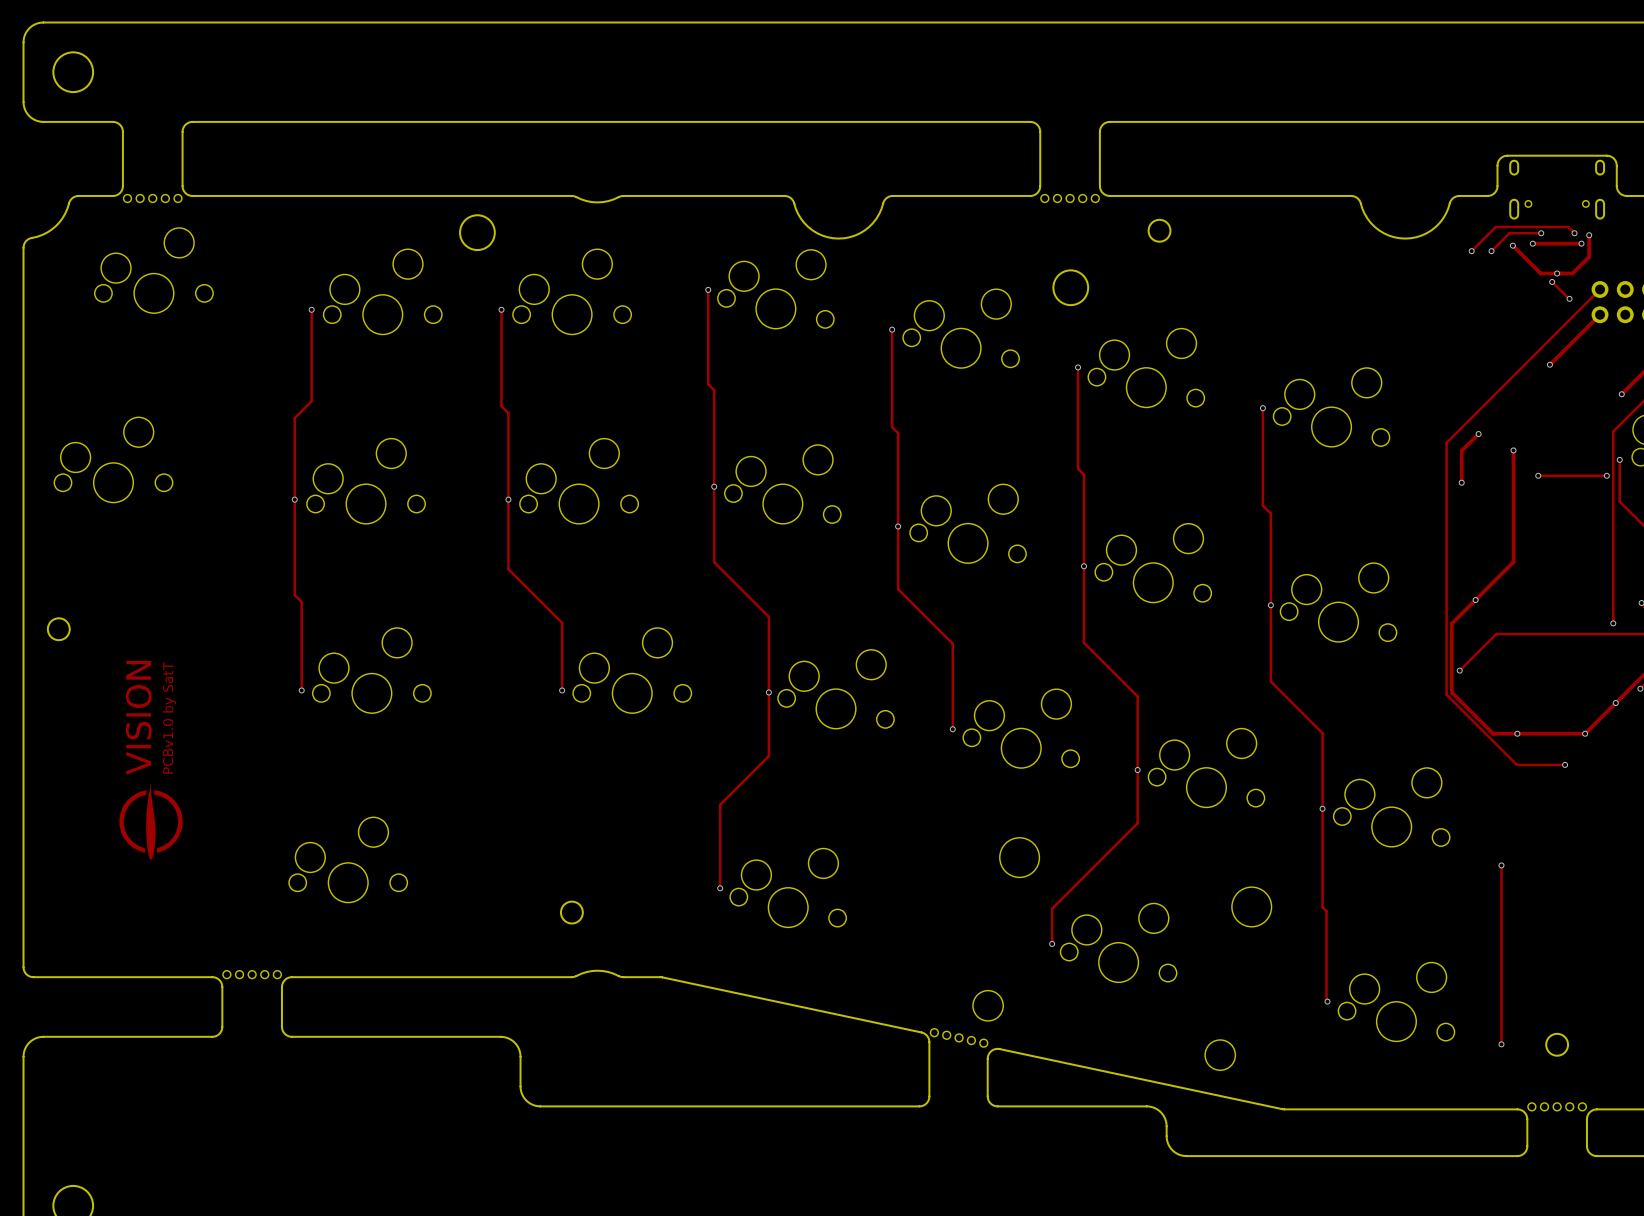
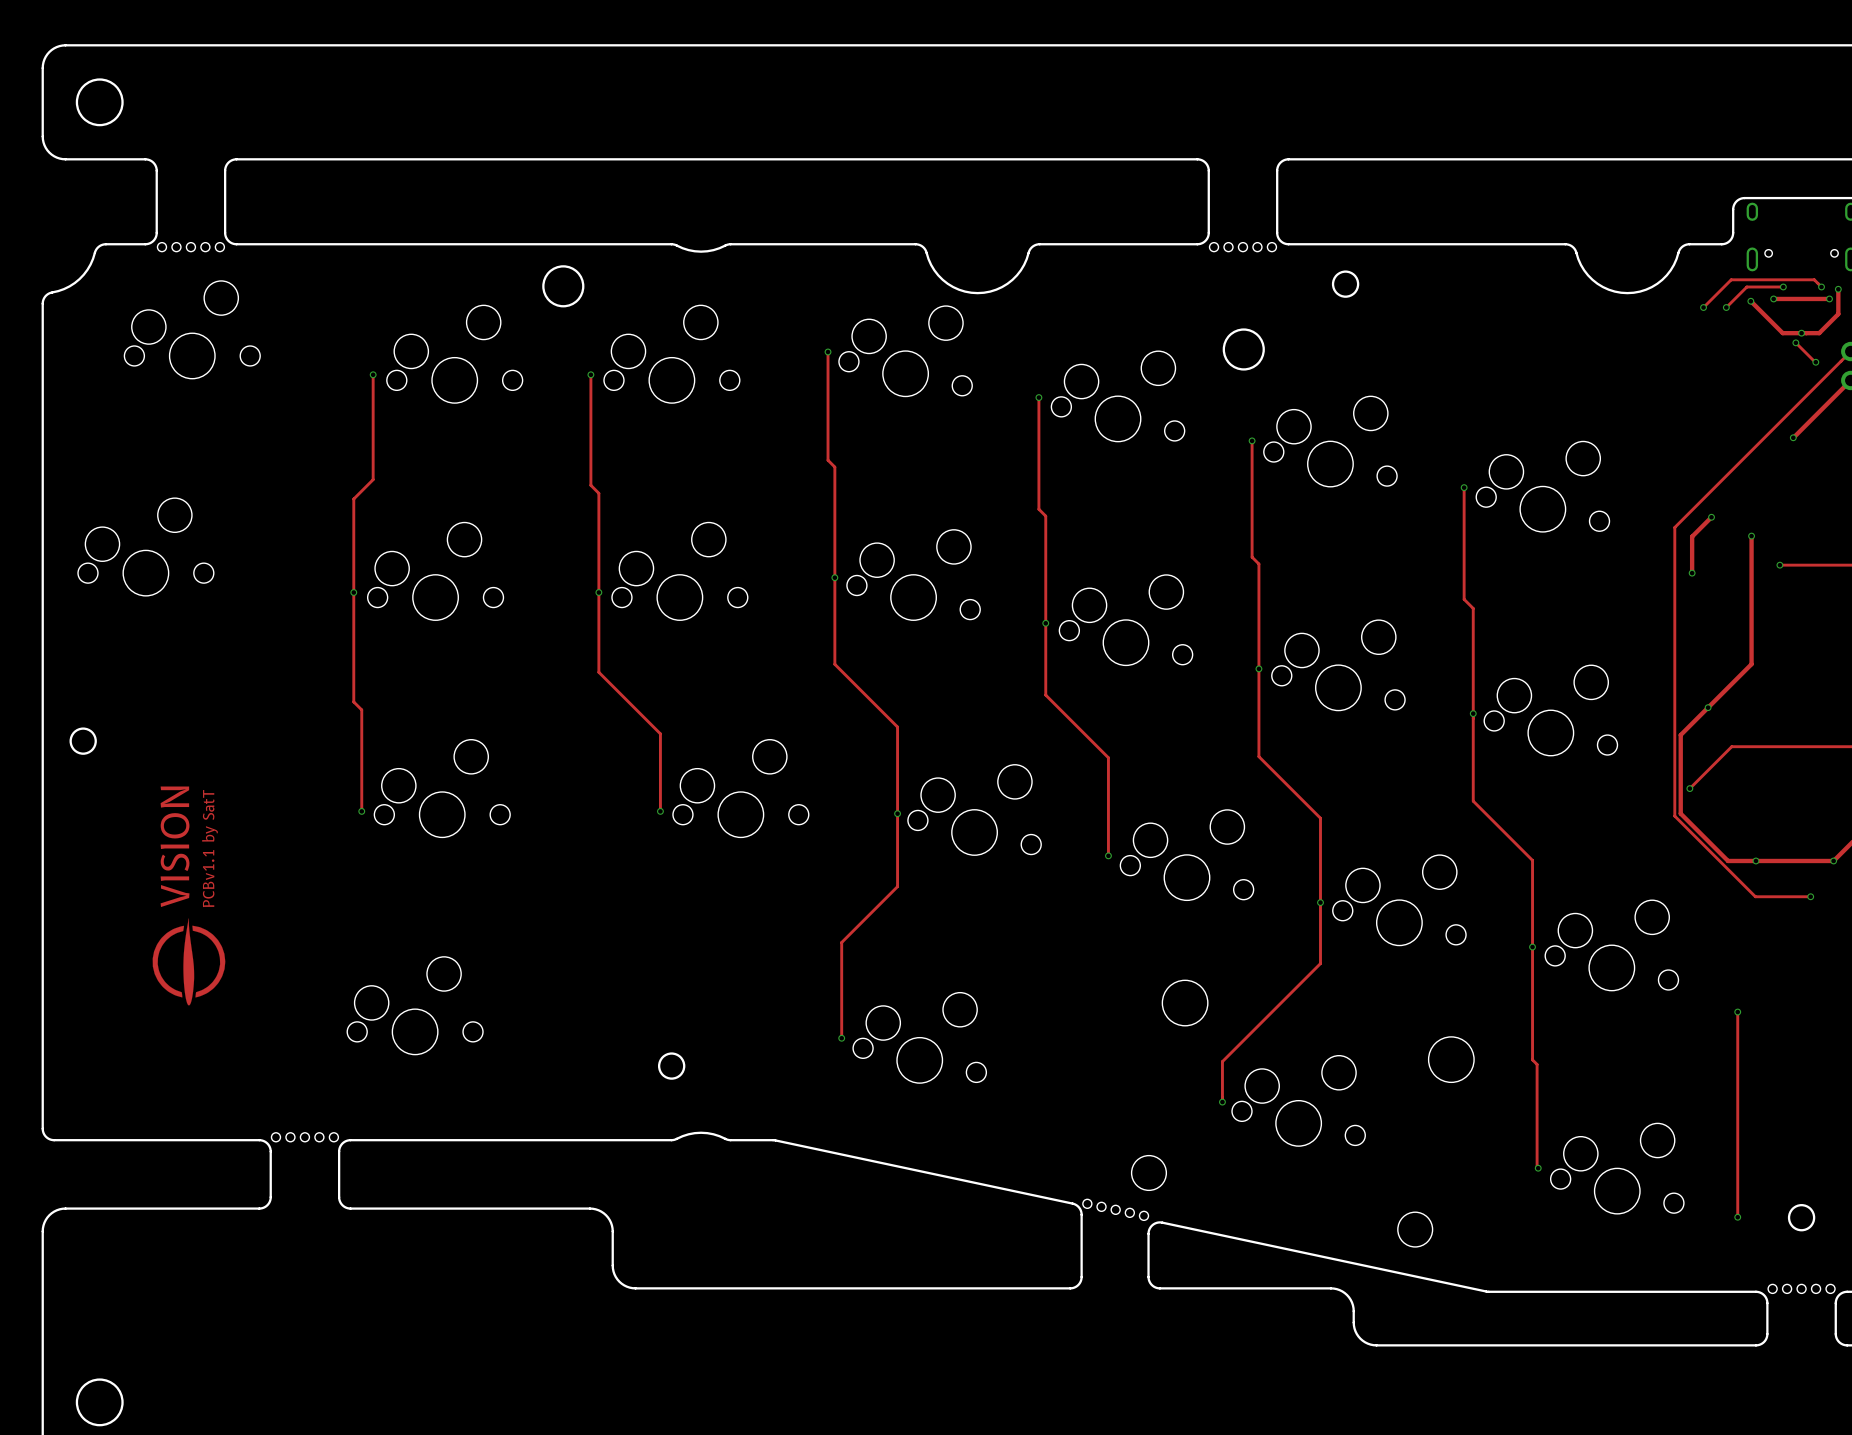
text: PCBv1.0 by SatT (169, 717) -> PCBv1.1 by SatT (210, 848)

